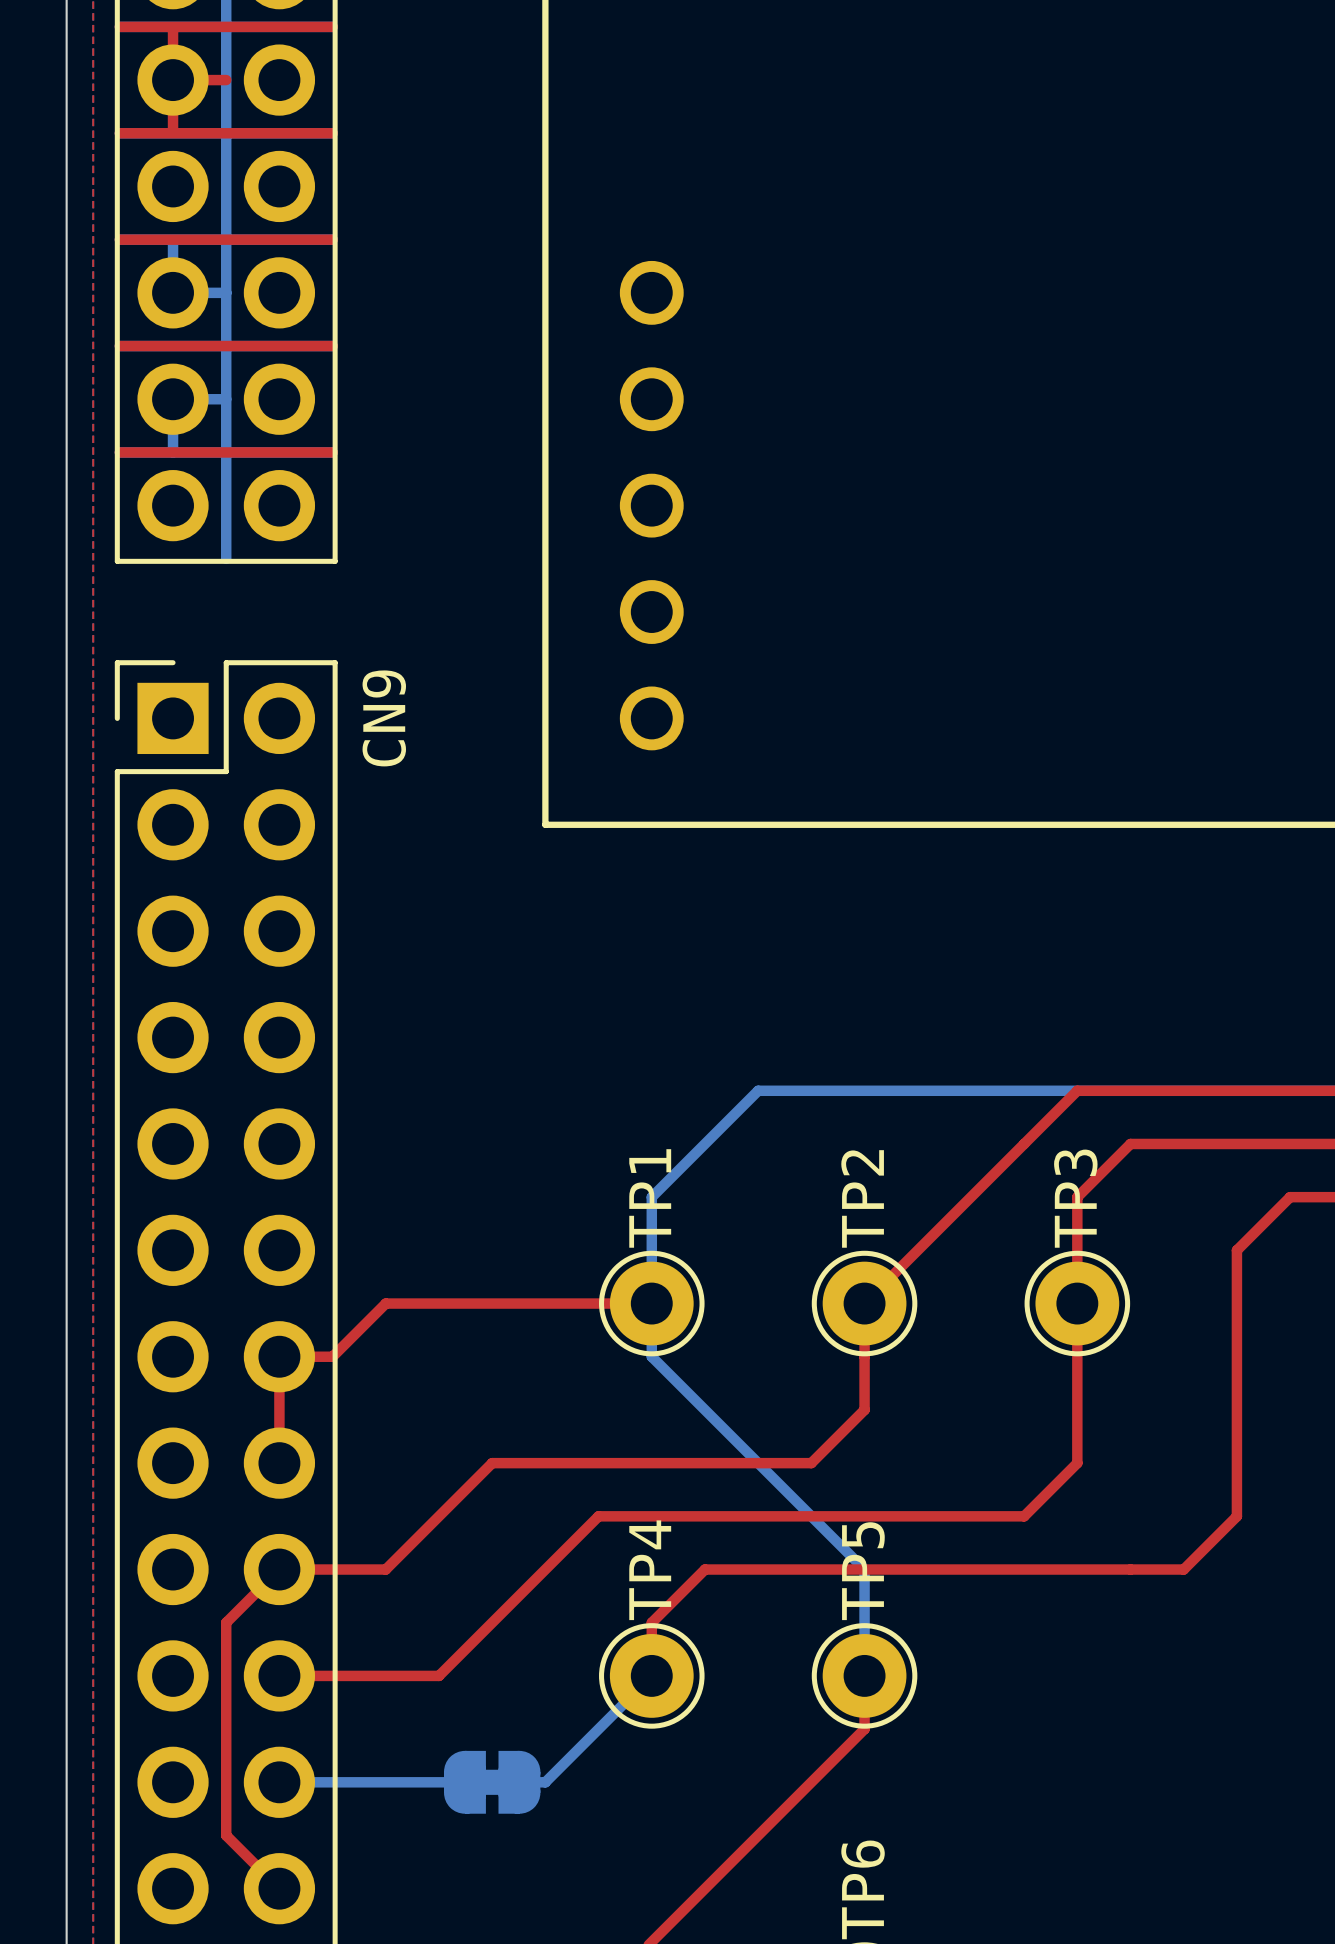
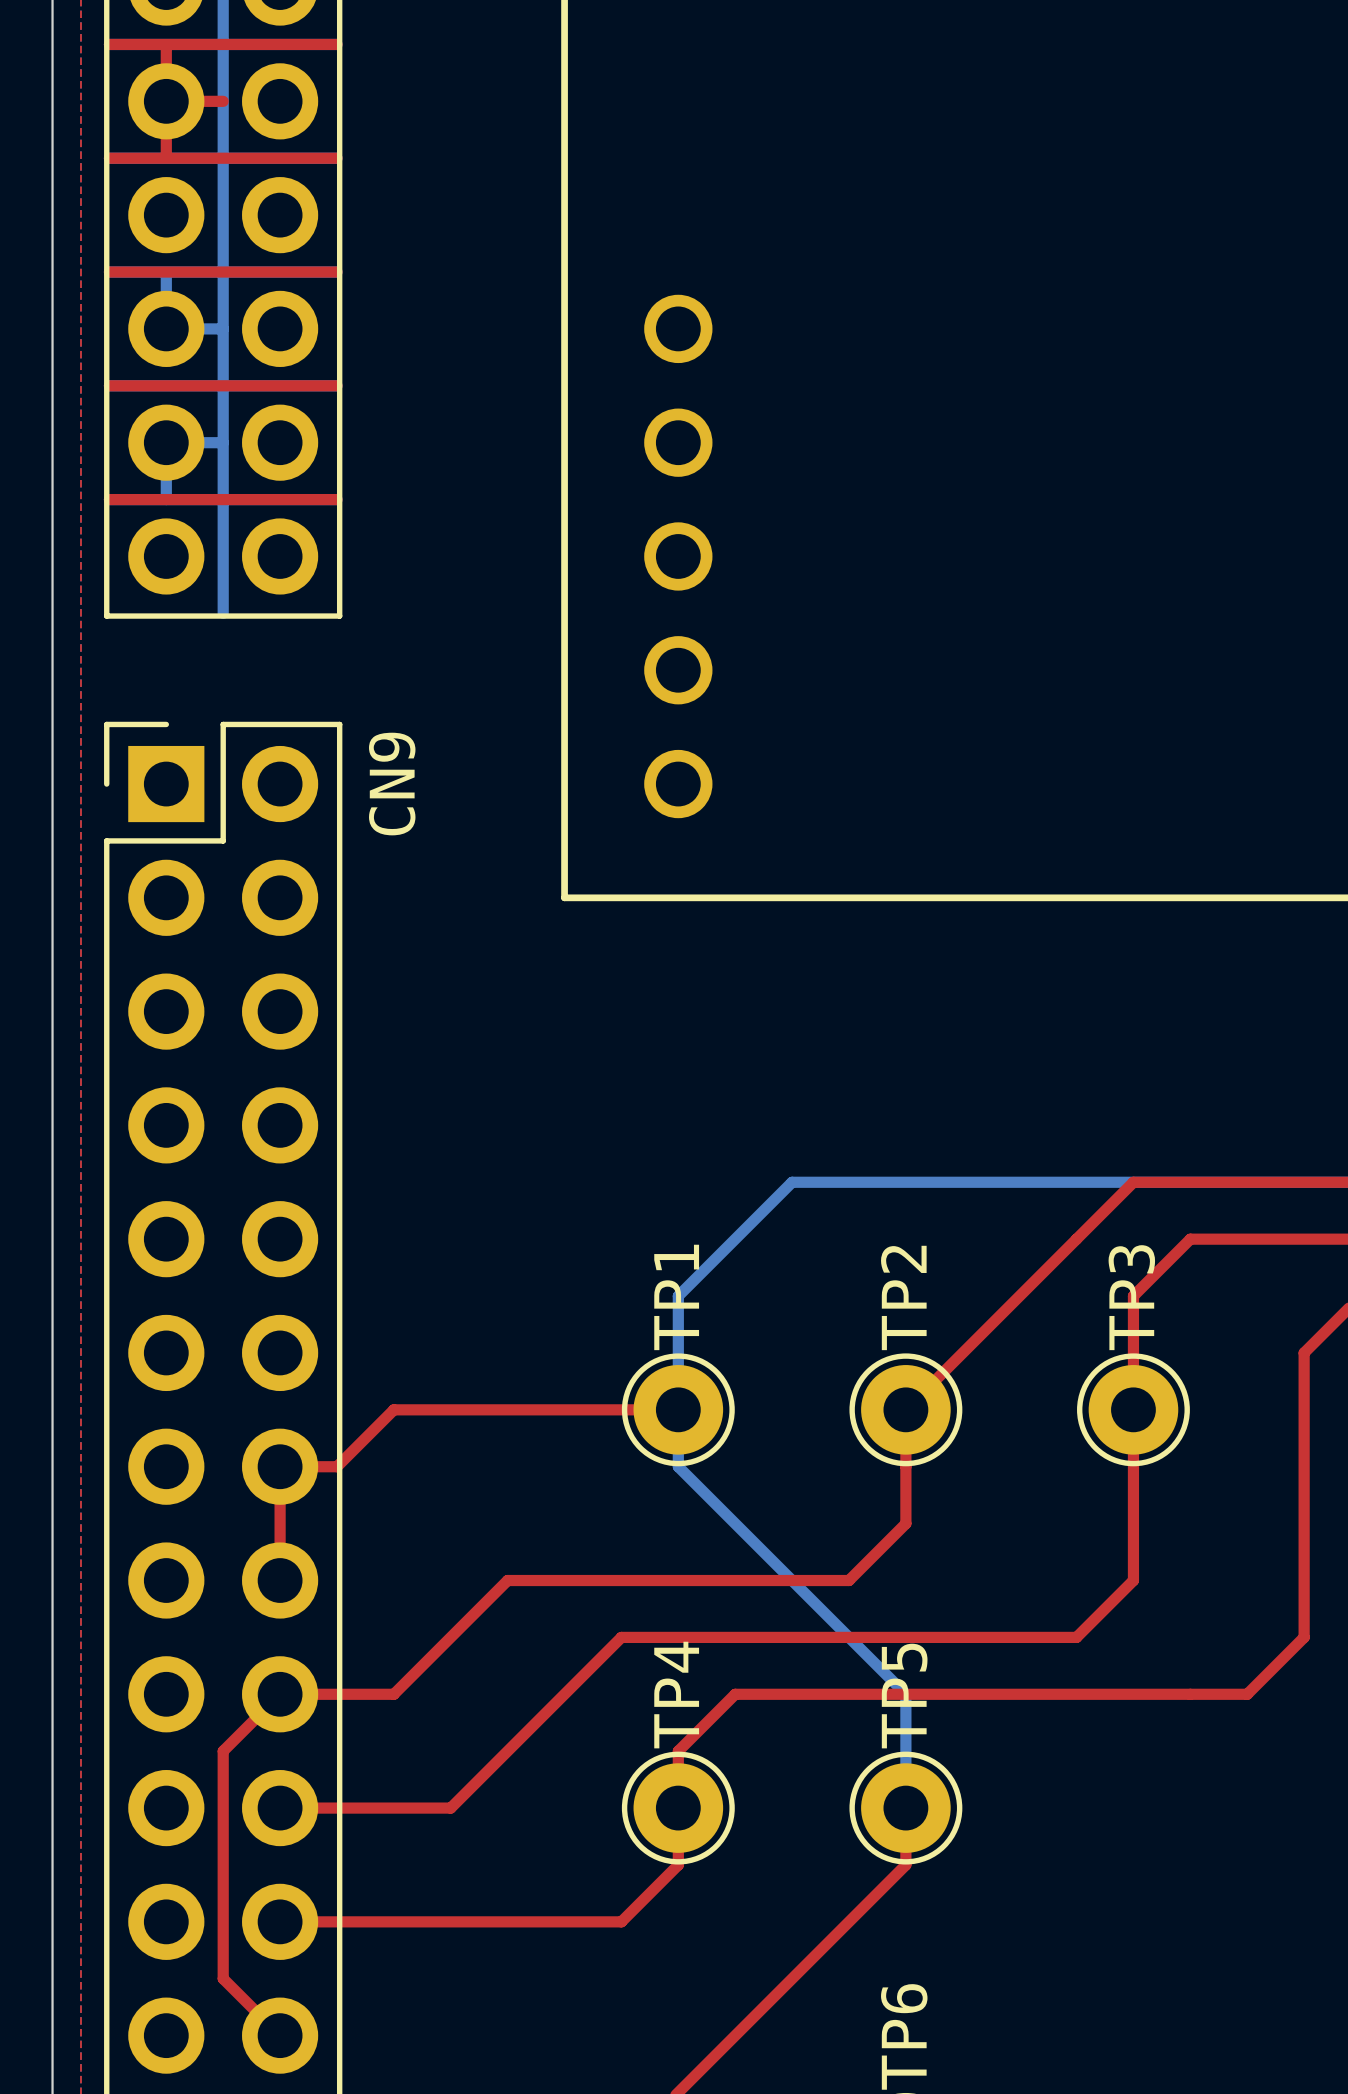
top track: none -> (678, 1808) (678, 1864) (621, 1921) (280, 1921)
bottom track: (651, 1675) (545, 1782) (519, 1782) -> none
bottom track: (279, 1782) (464, 1782) -> none
part: (492, 1782) -> none

